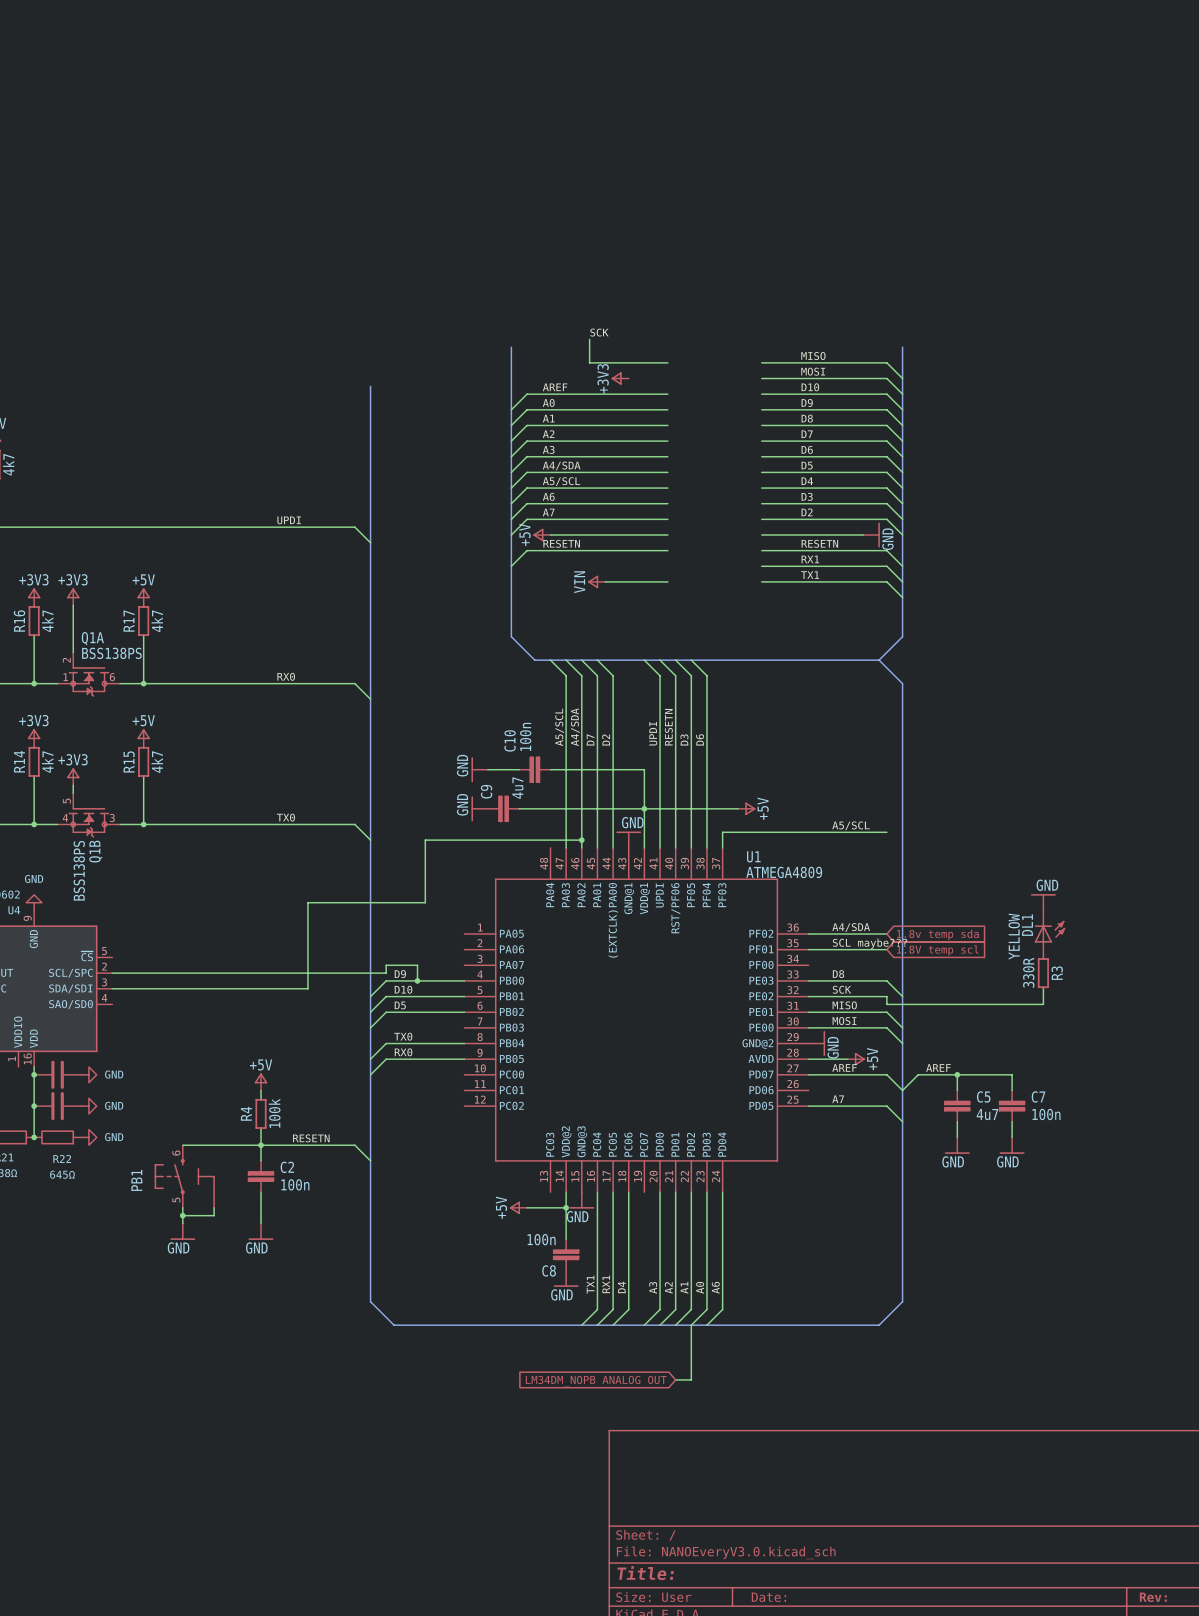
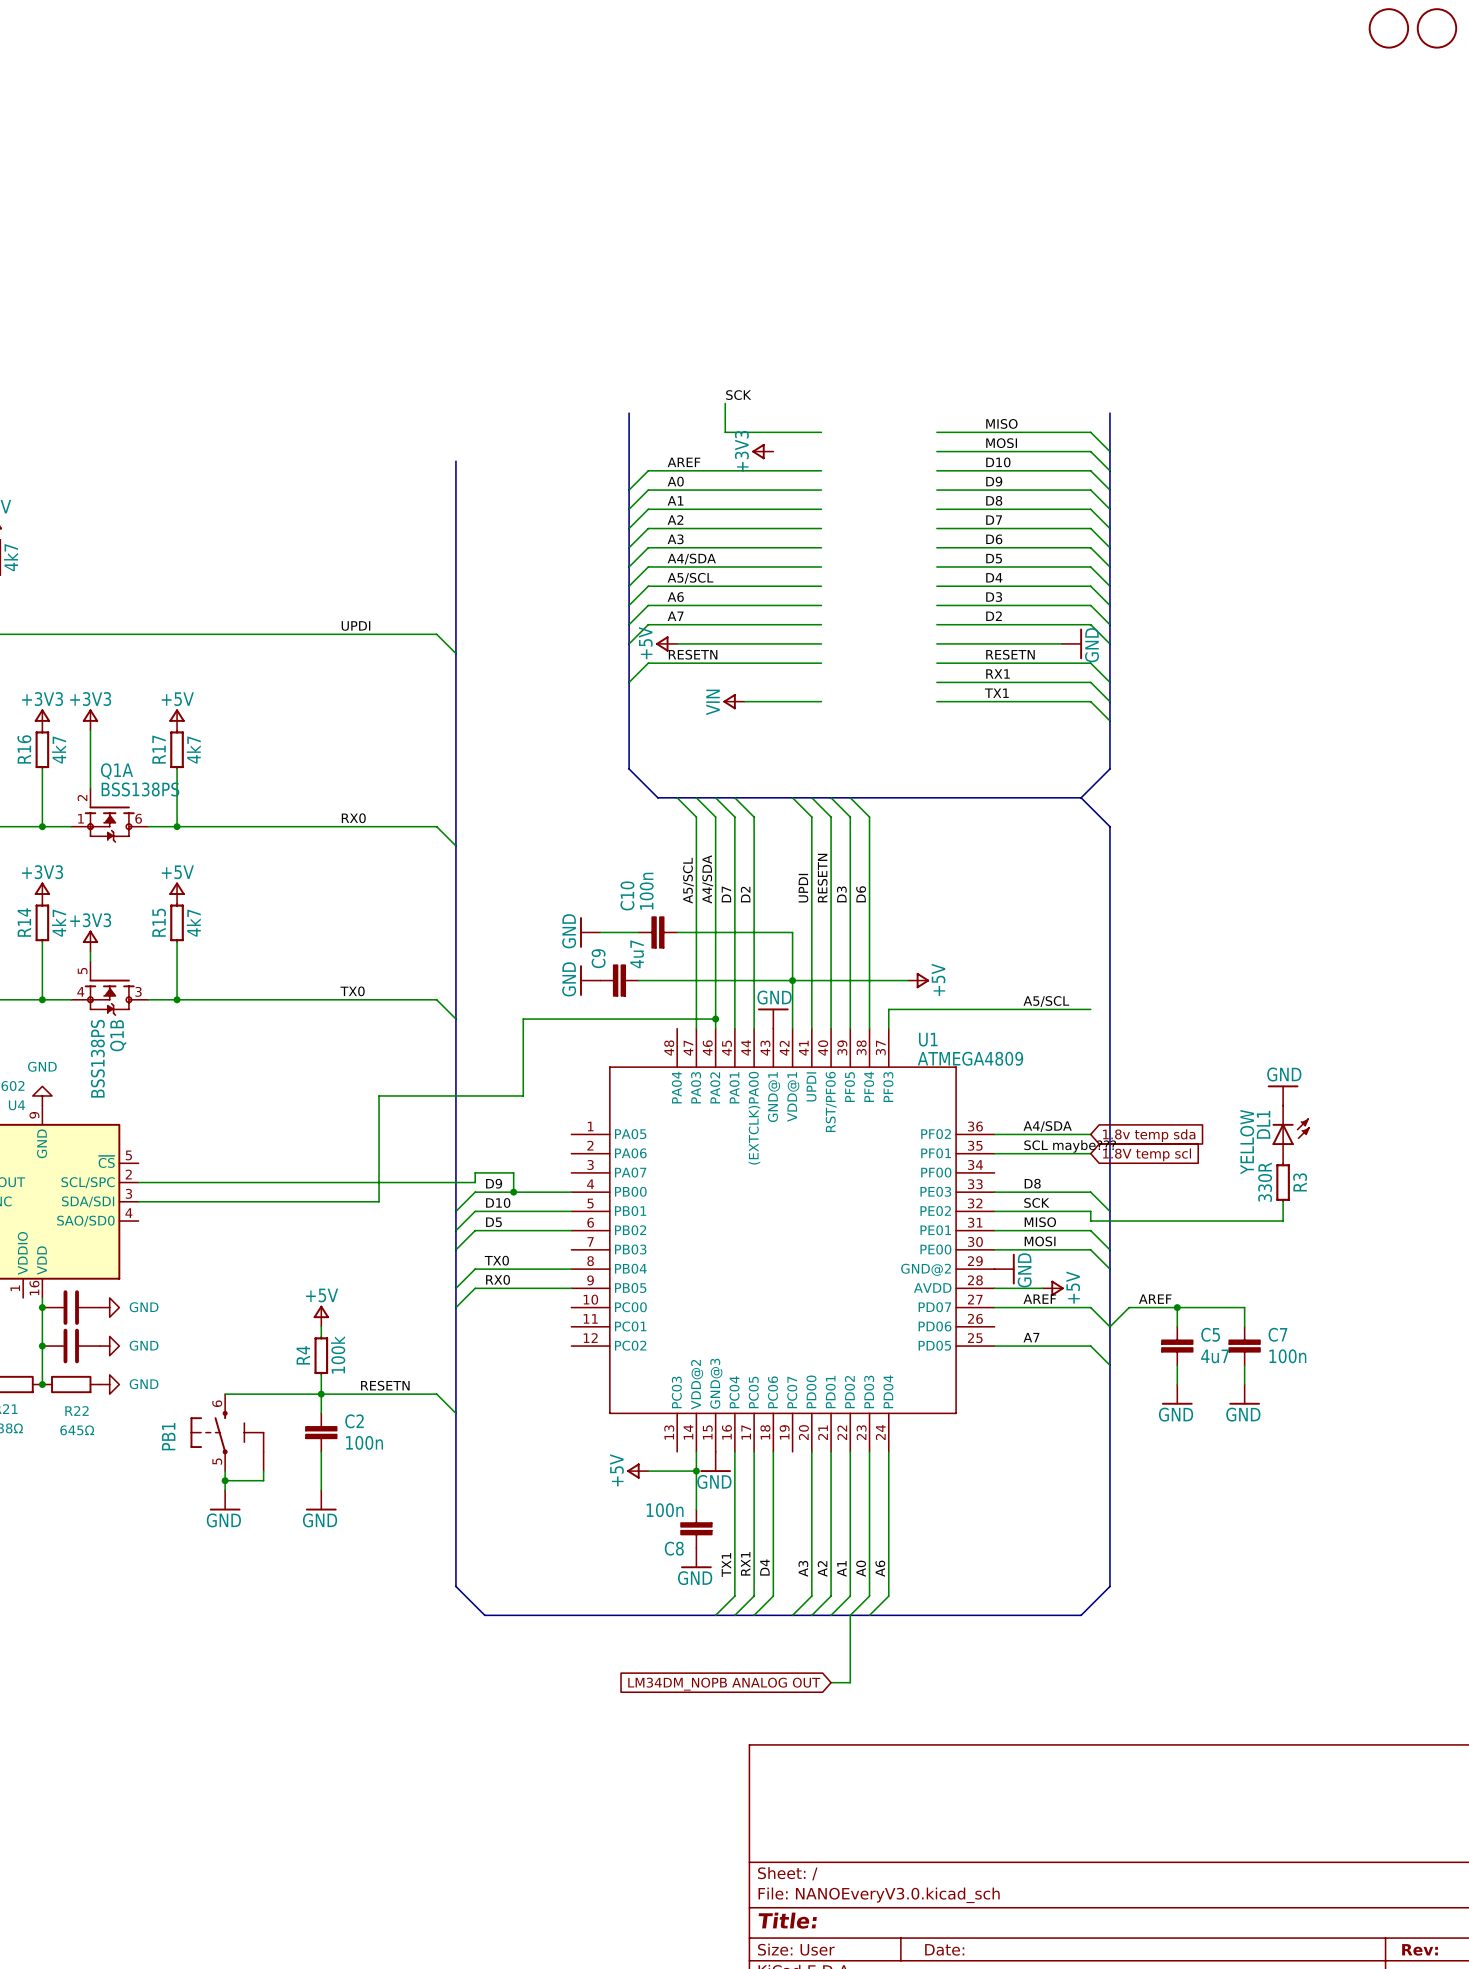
part: none -> (1388, 28)
part: none -> (1436, 28)

